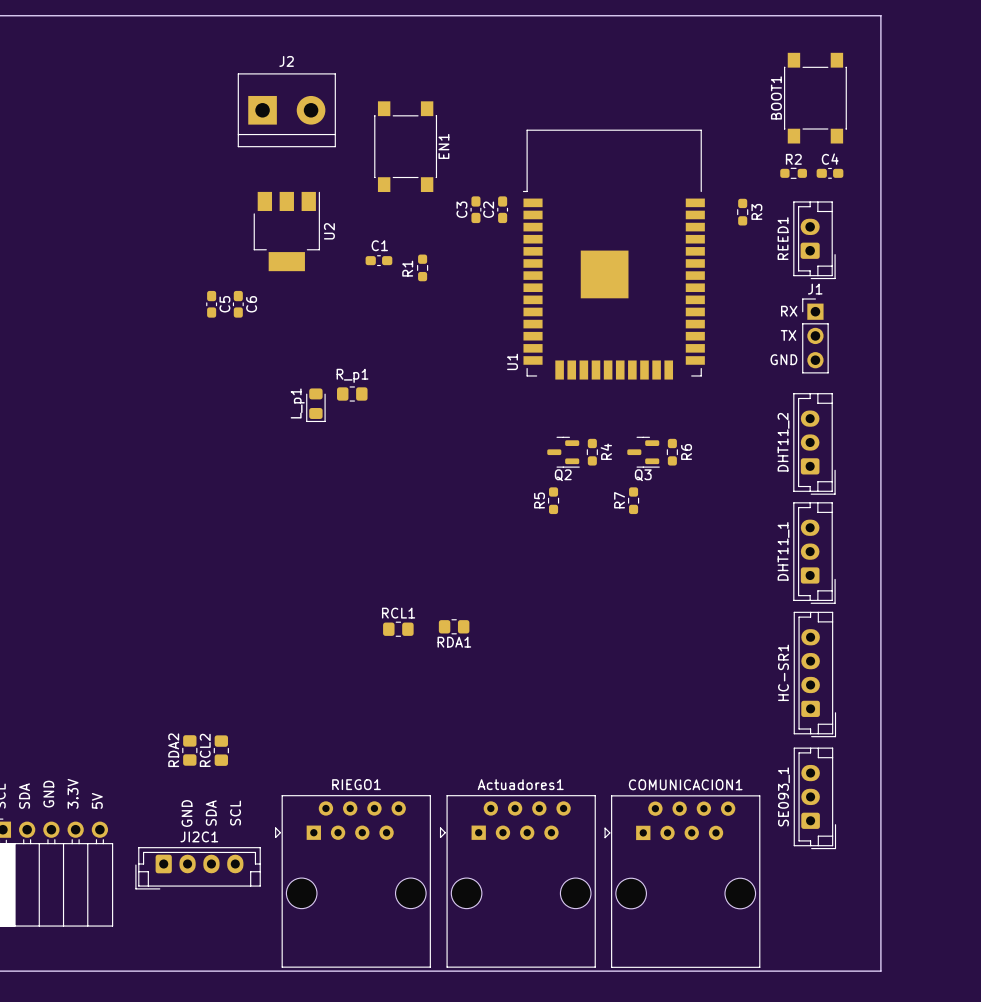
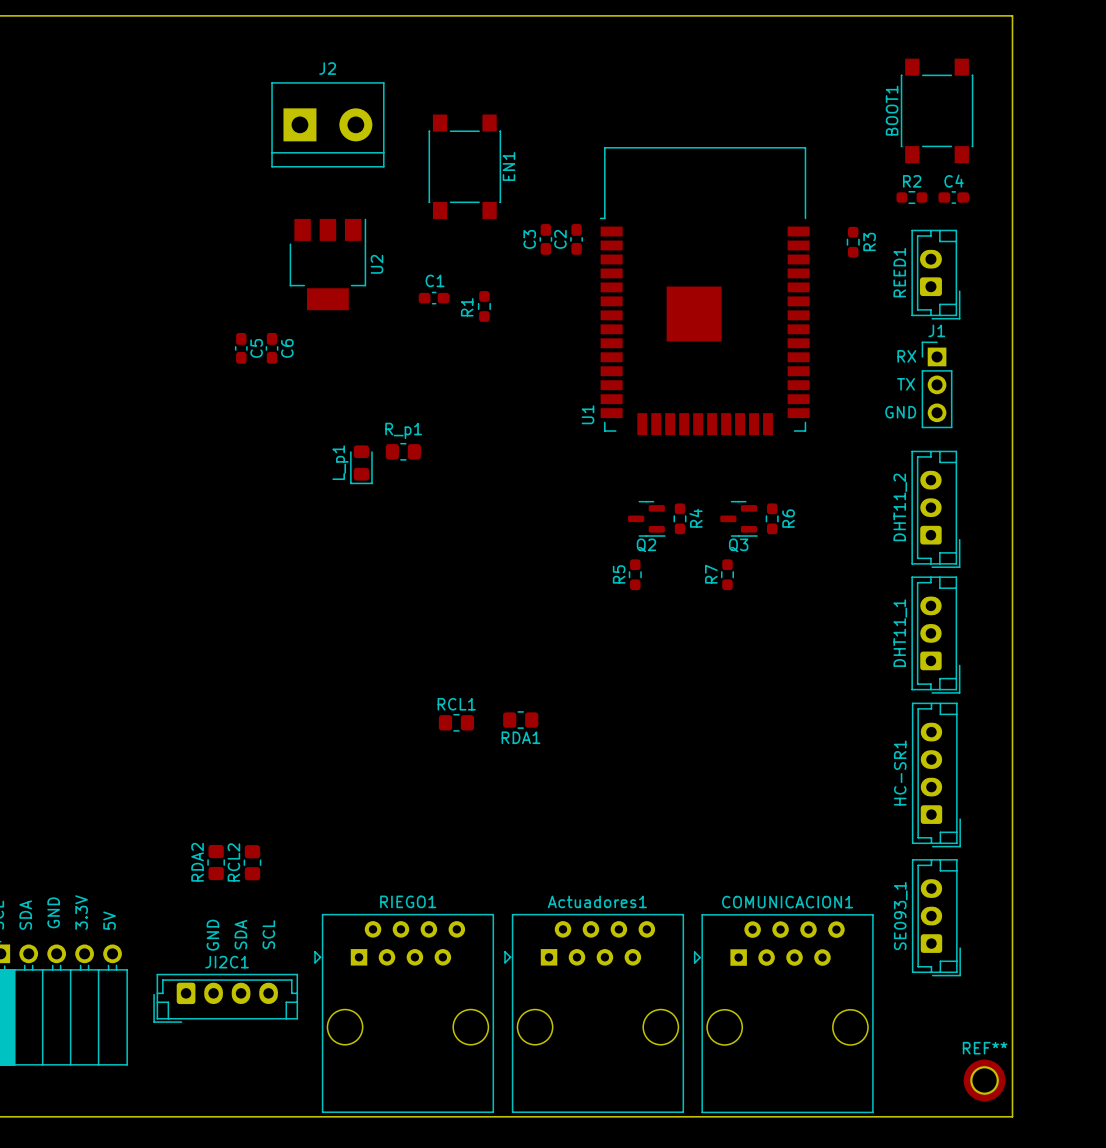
REF**: none -> (984, 1080)

